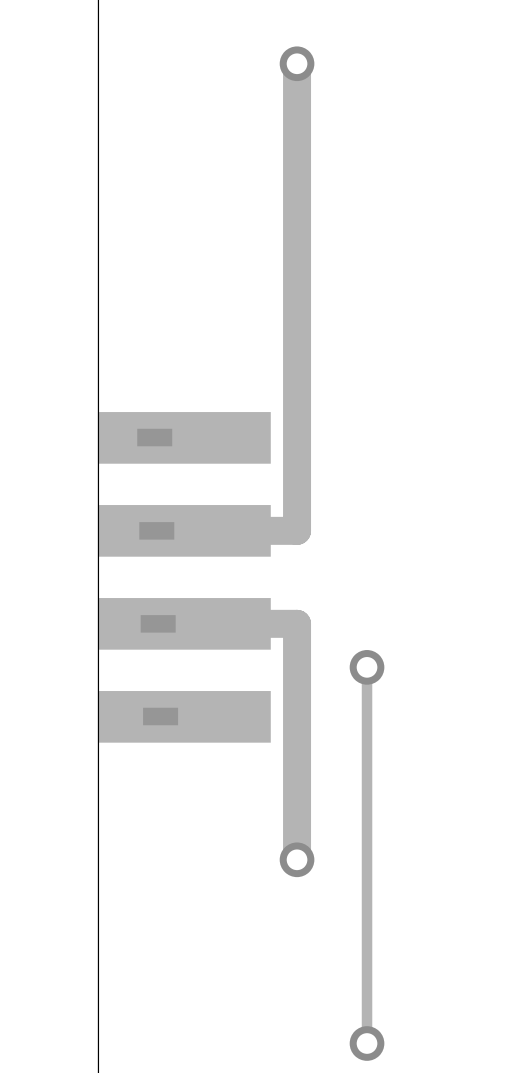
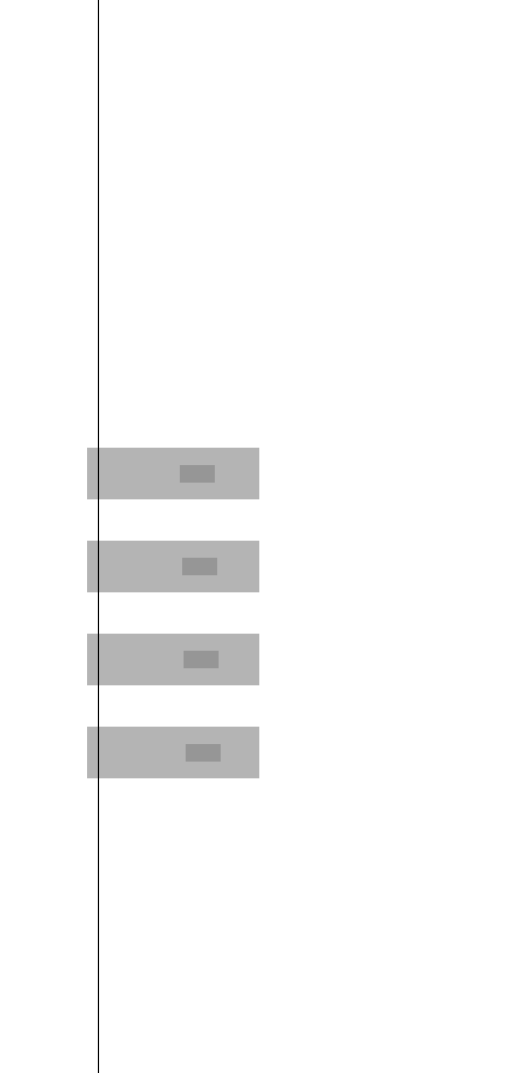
track: (297, 63) (297, 530) (156, 530) -> none
via: (297, 63) -> none
part rotation: 0° (184, 577) -> 180° (173, 613)
track: (158, 623) (297, 623) (297, 859) -> none
track: (367, 667) (367, 1043) -> none
via: (367, 667) -> none
via: (297, 859) -> none
via: (367, 1043) -> none

